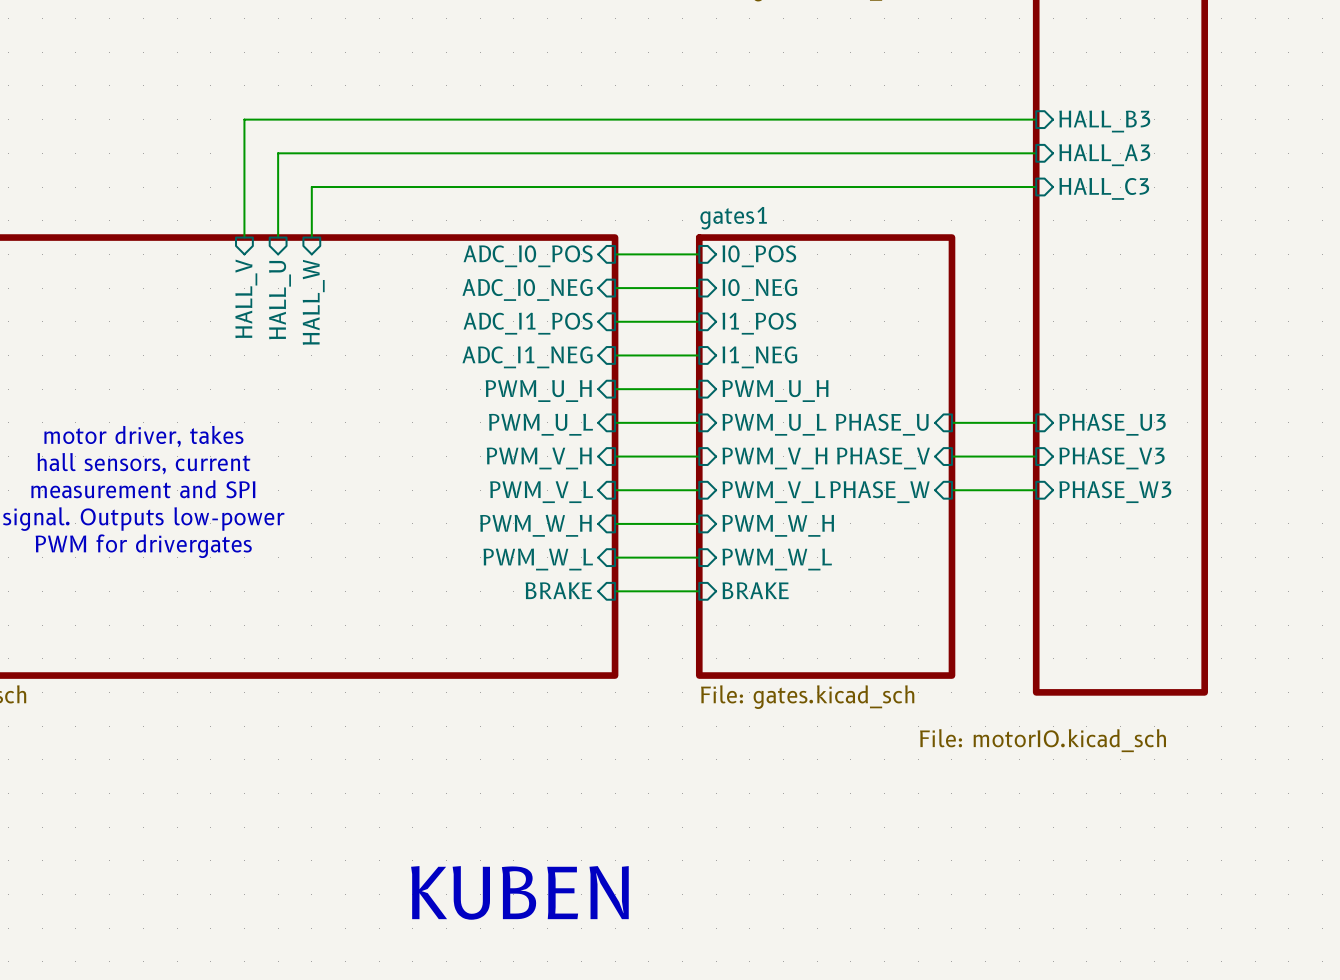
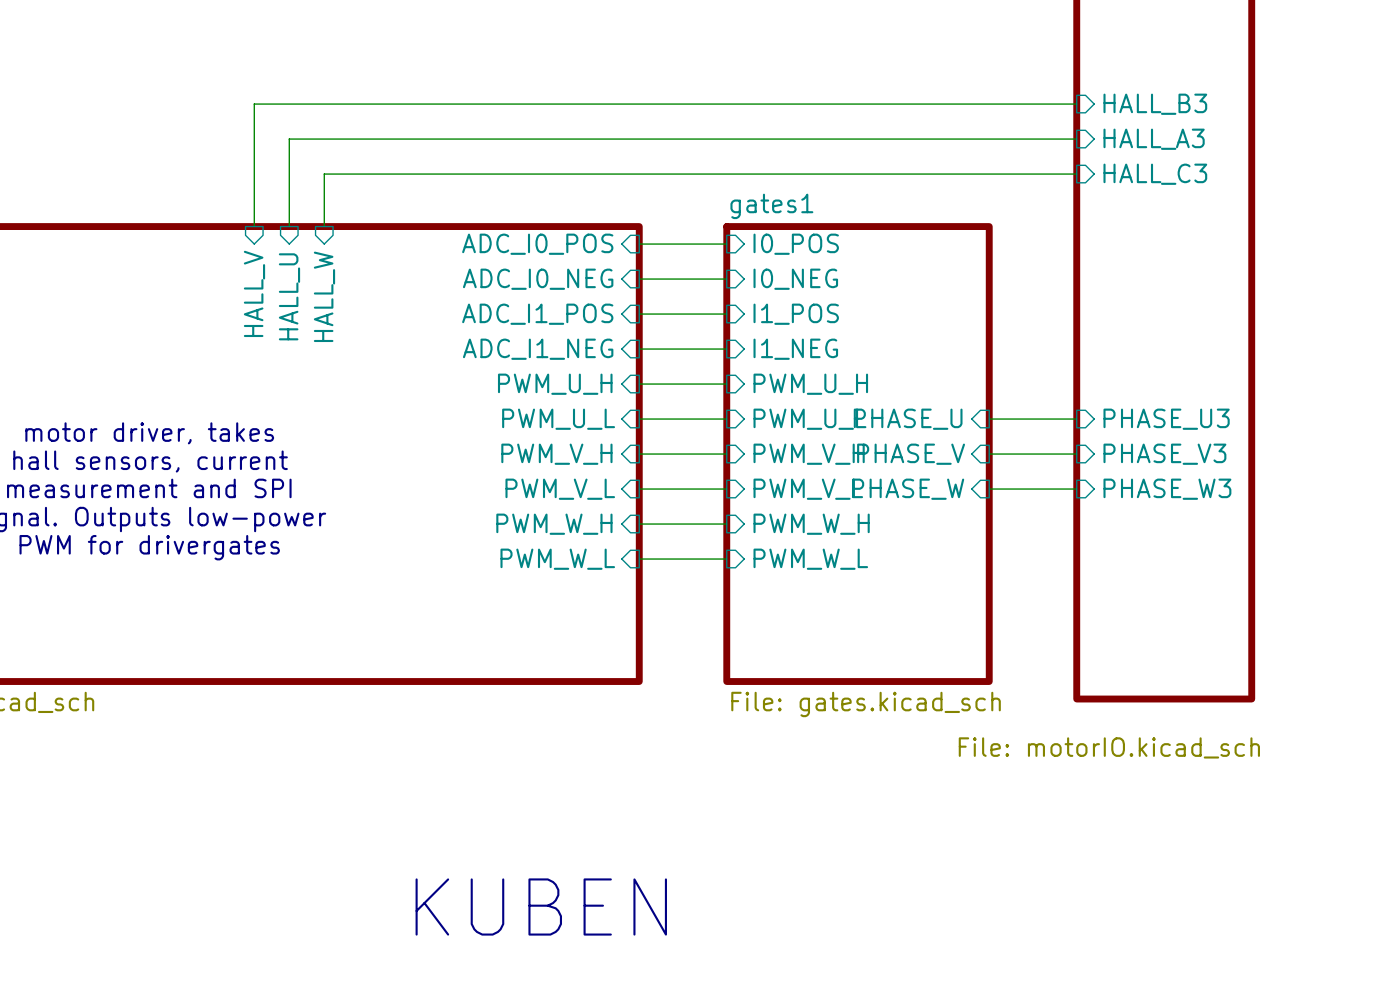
sheet pin: BRAKE (558, 590) -> none
sheet pin: BRAKE (755, 590) -> none
wire: (615, 591) (699, 591) -> none

